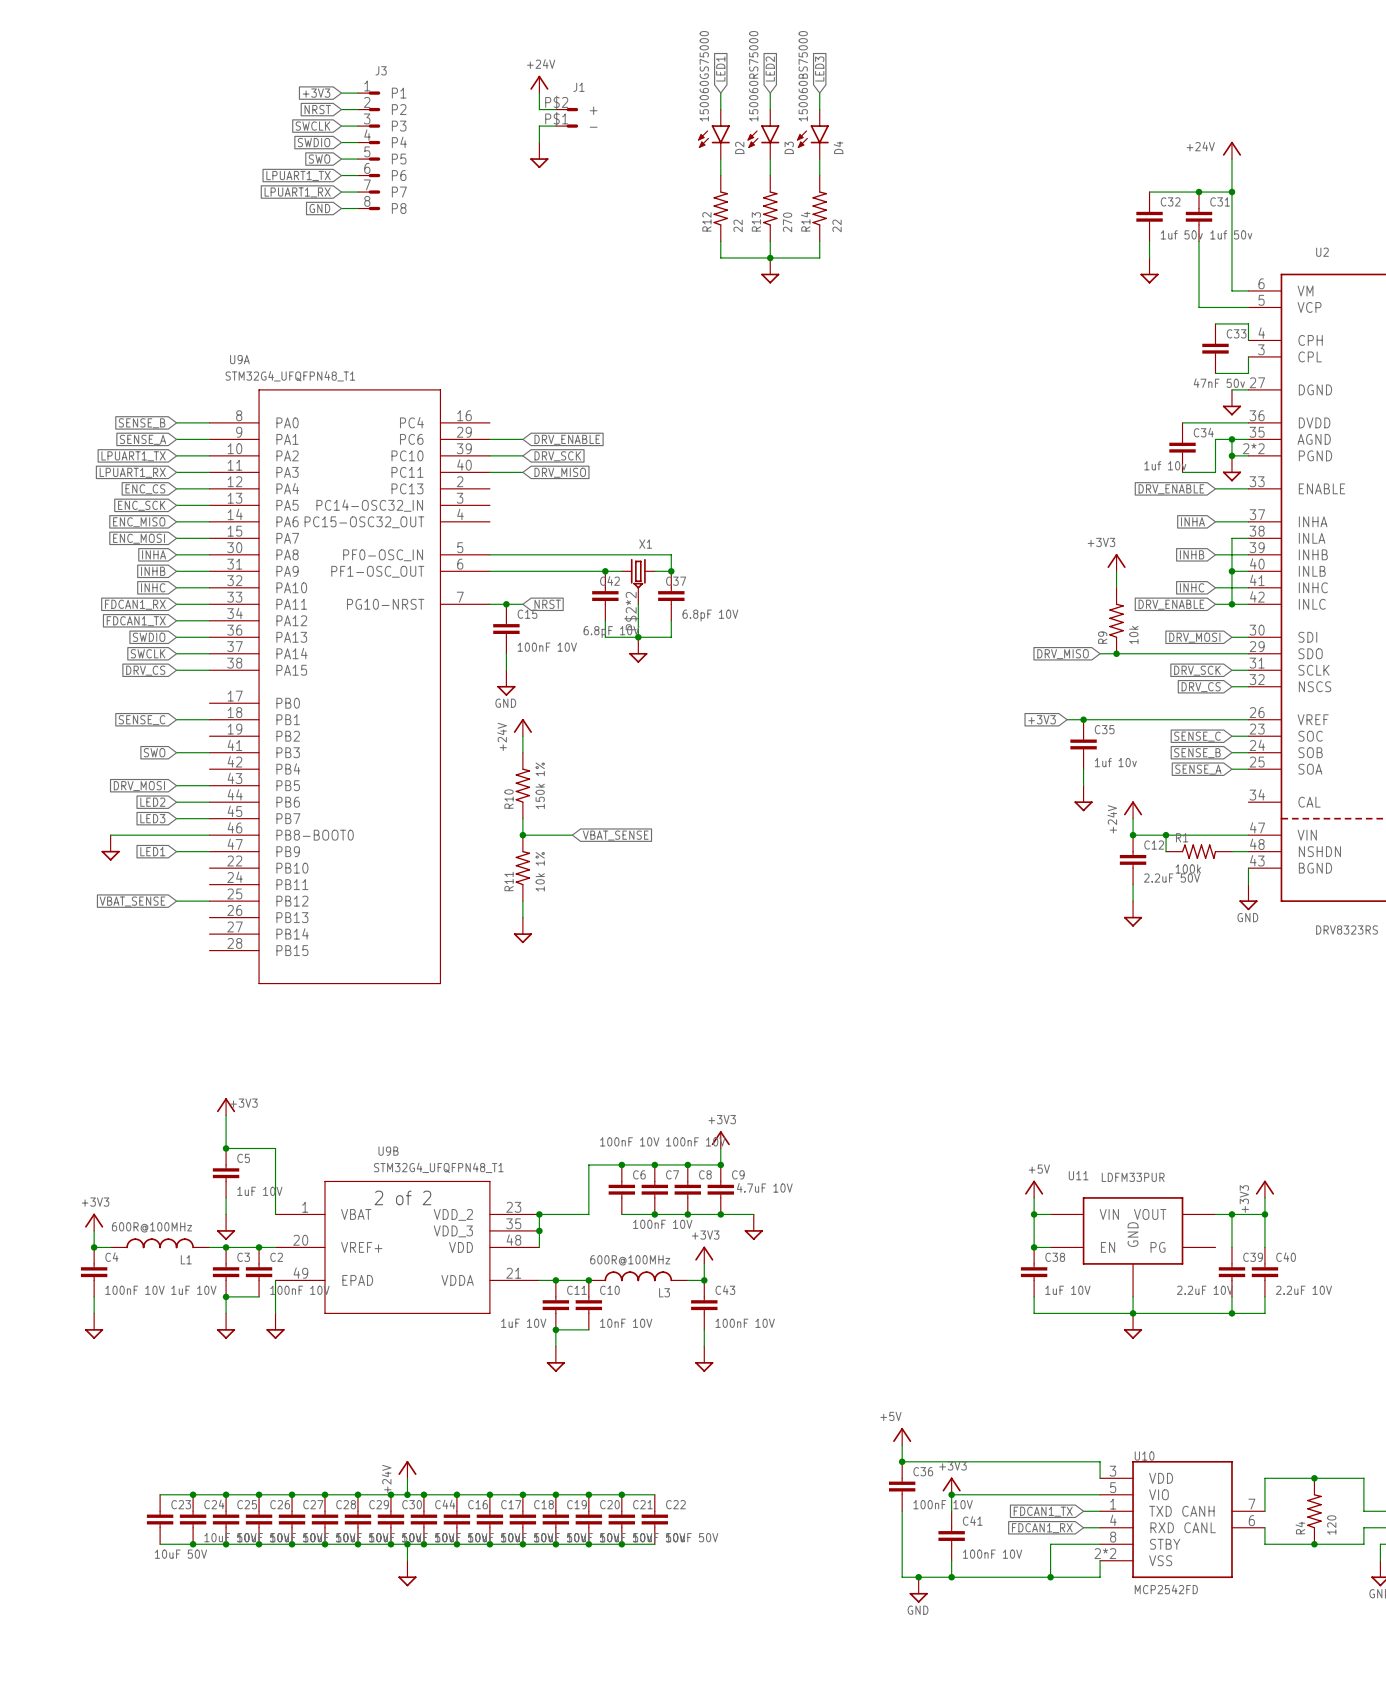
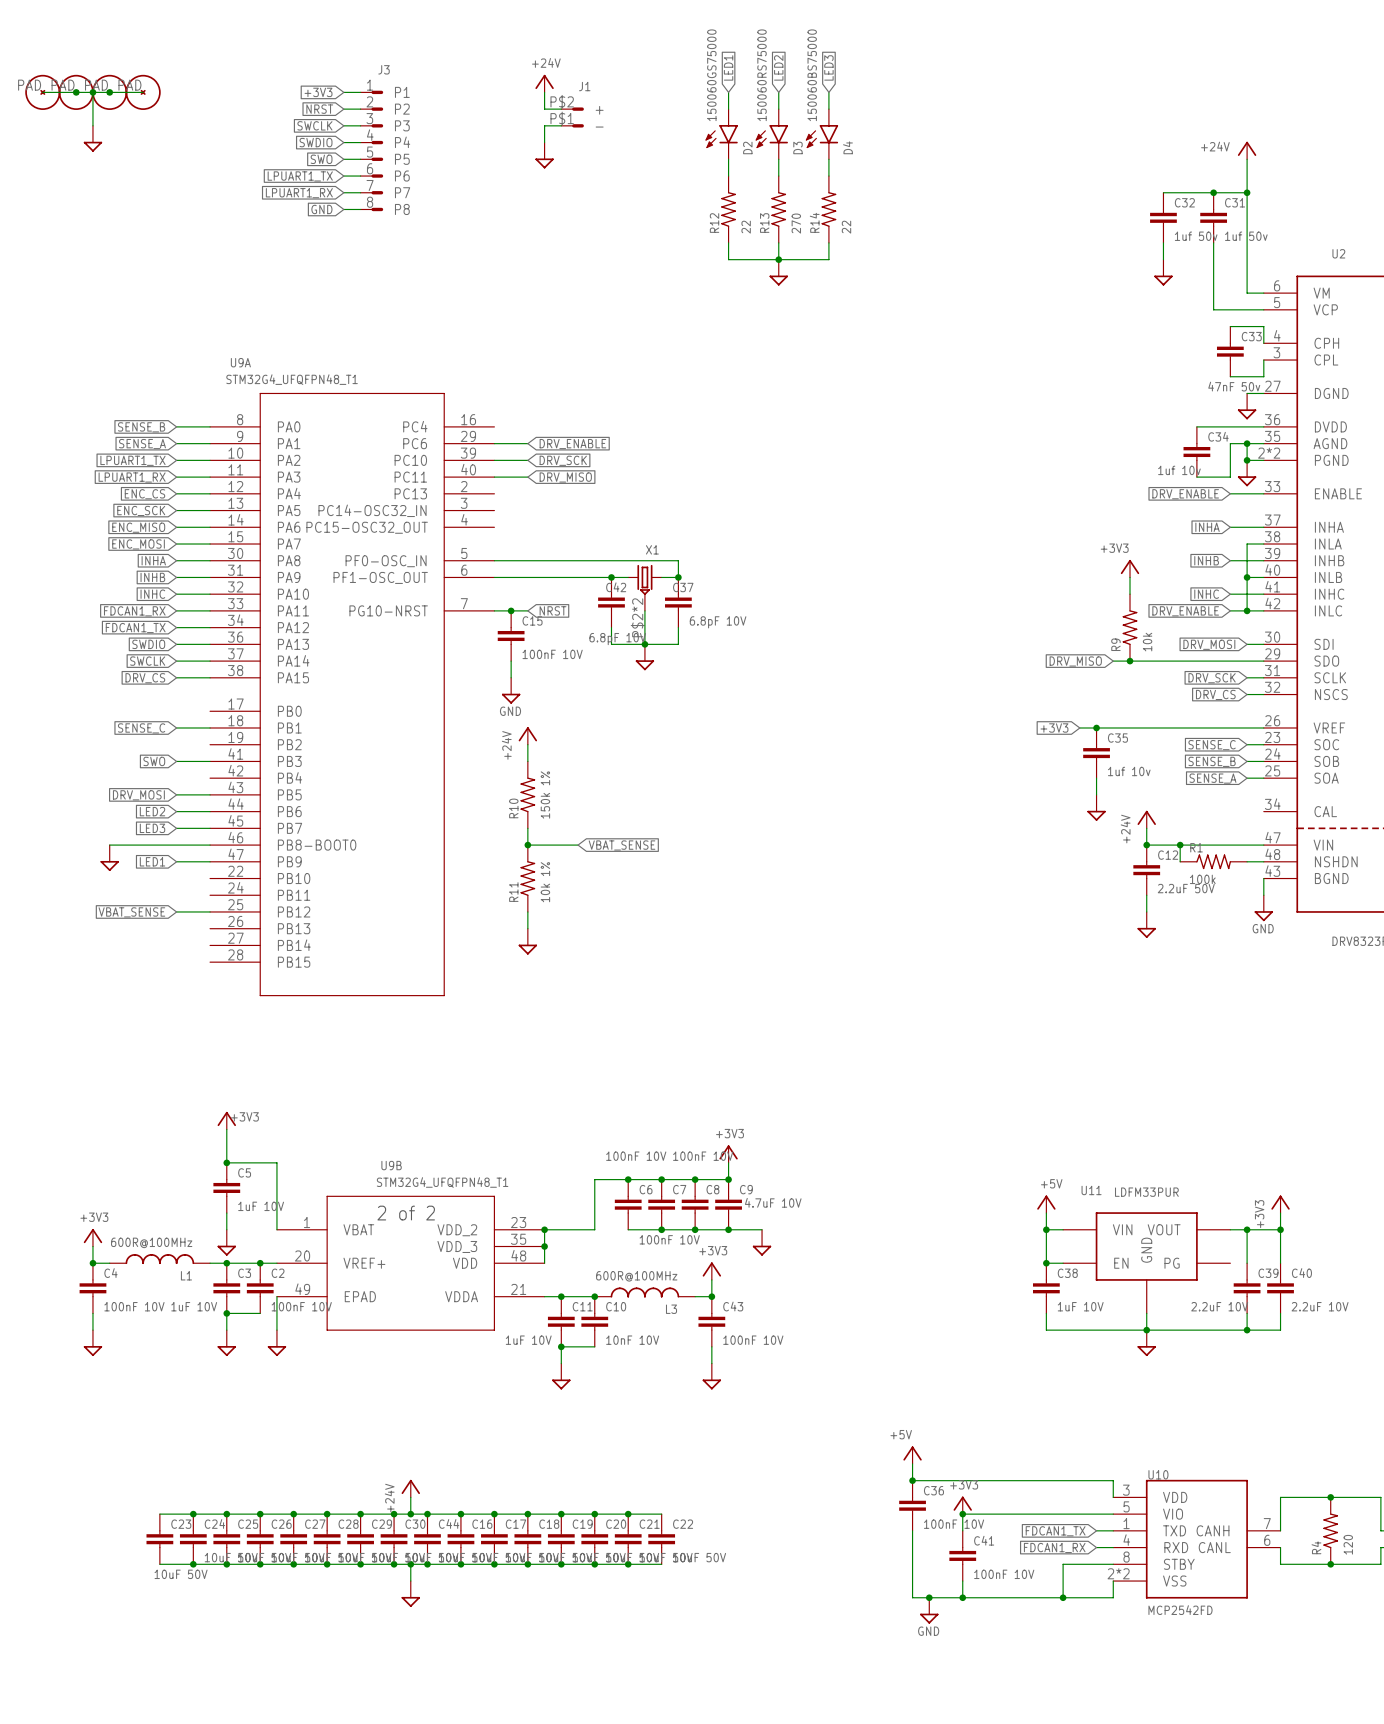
wire: none -> (42, 92) (143, 92)
part: none -> (42, 92)
part: none -> (76, 92)
junction: none -> (76, 92)
wire: none -> (92, 92) (92, 125)
junction: none -> (92, 92)
part: none -> (109, 92)
junction: none -> (109, 92)
part: none -> (143, 92)
power symbol: none -> (92, 138)

